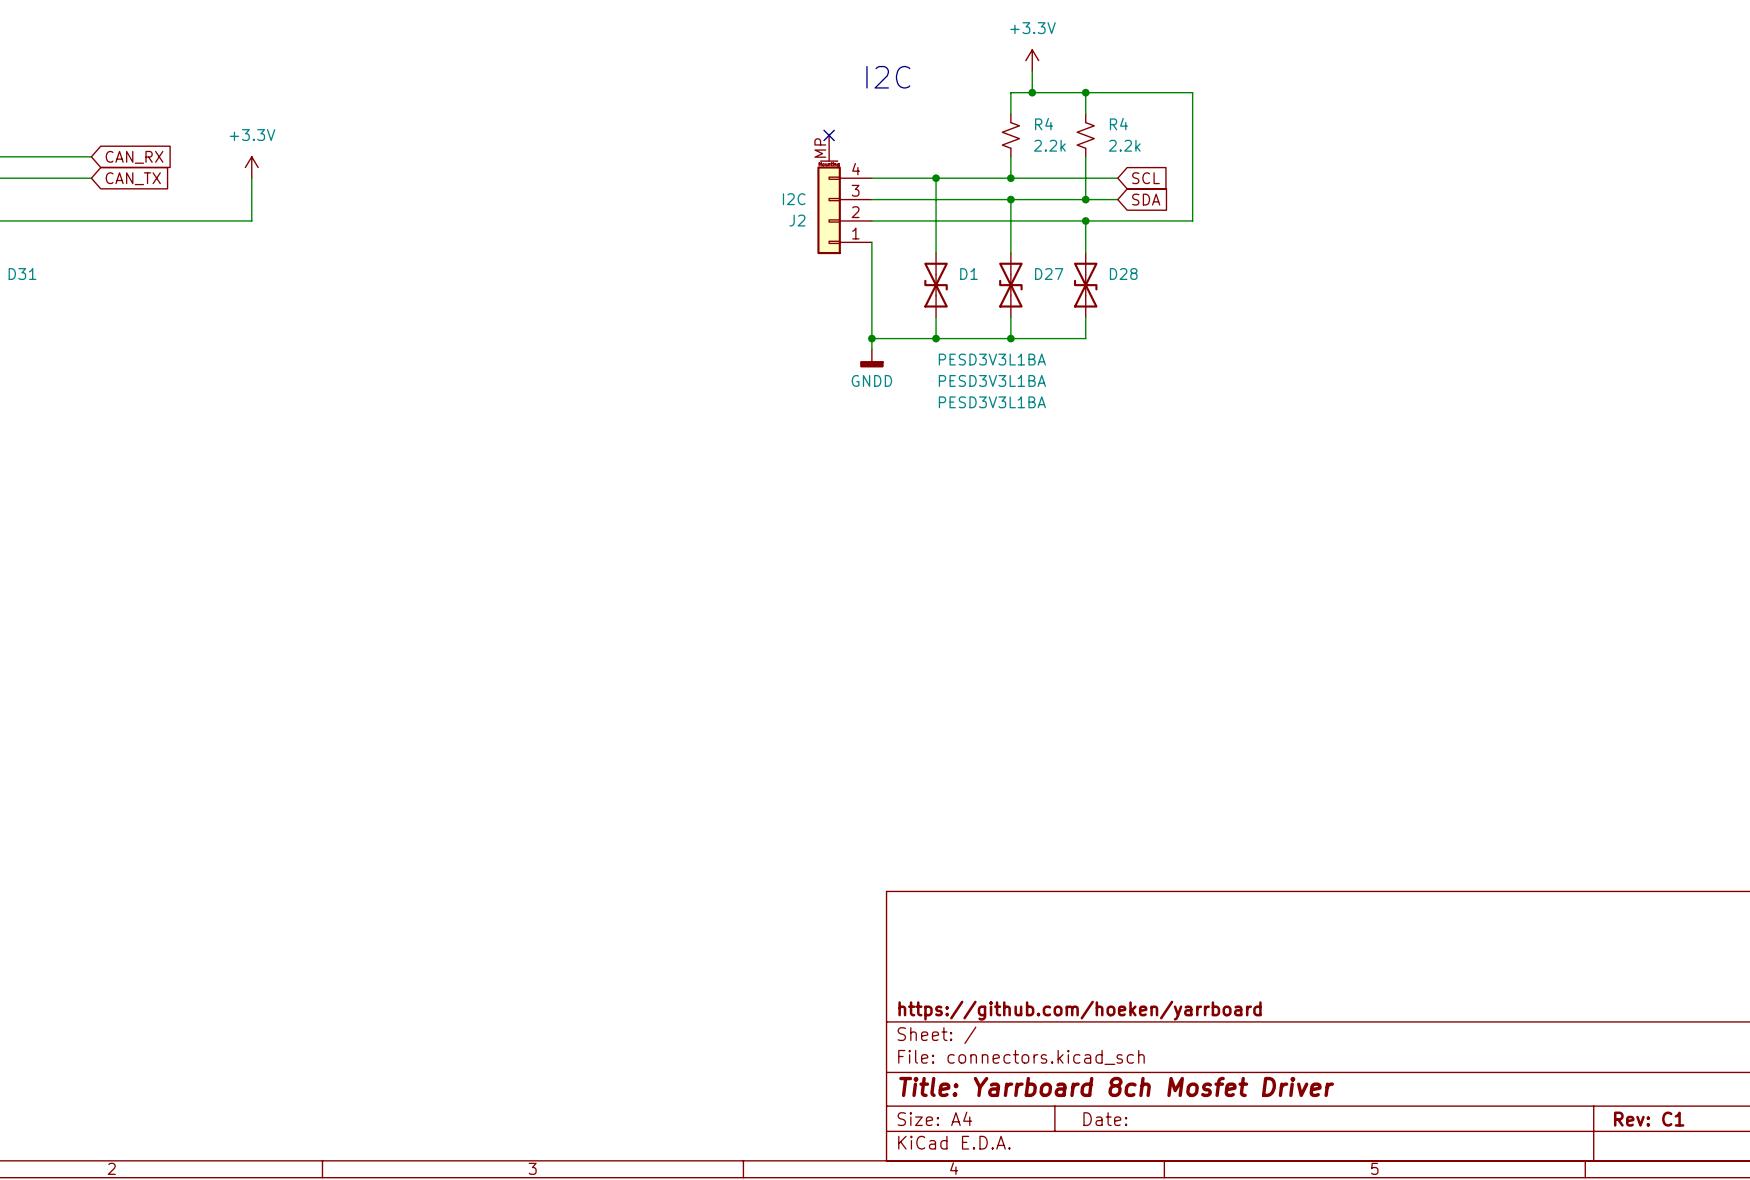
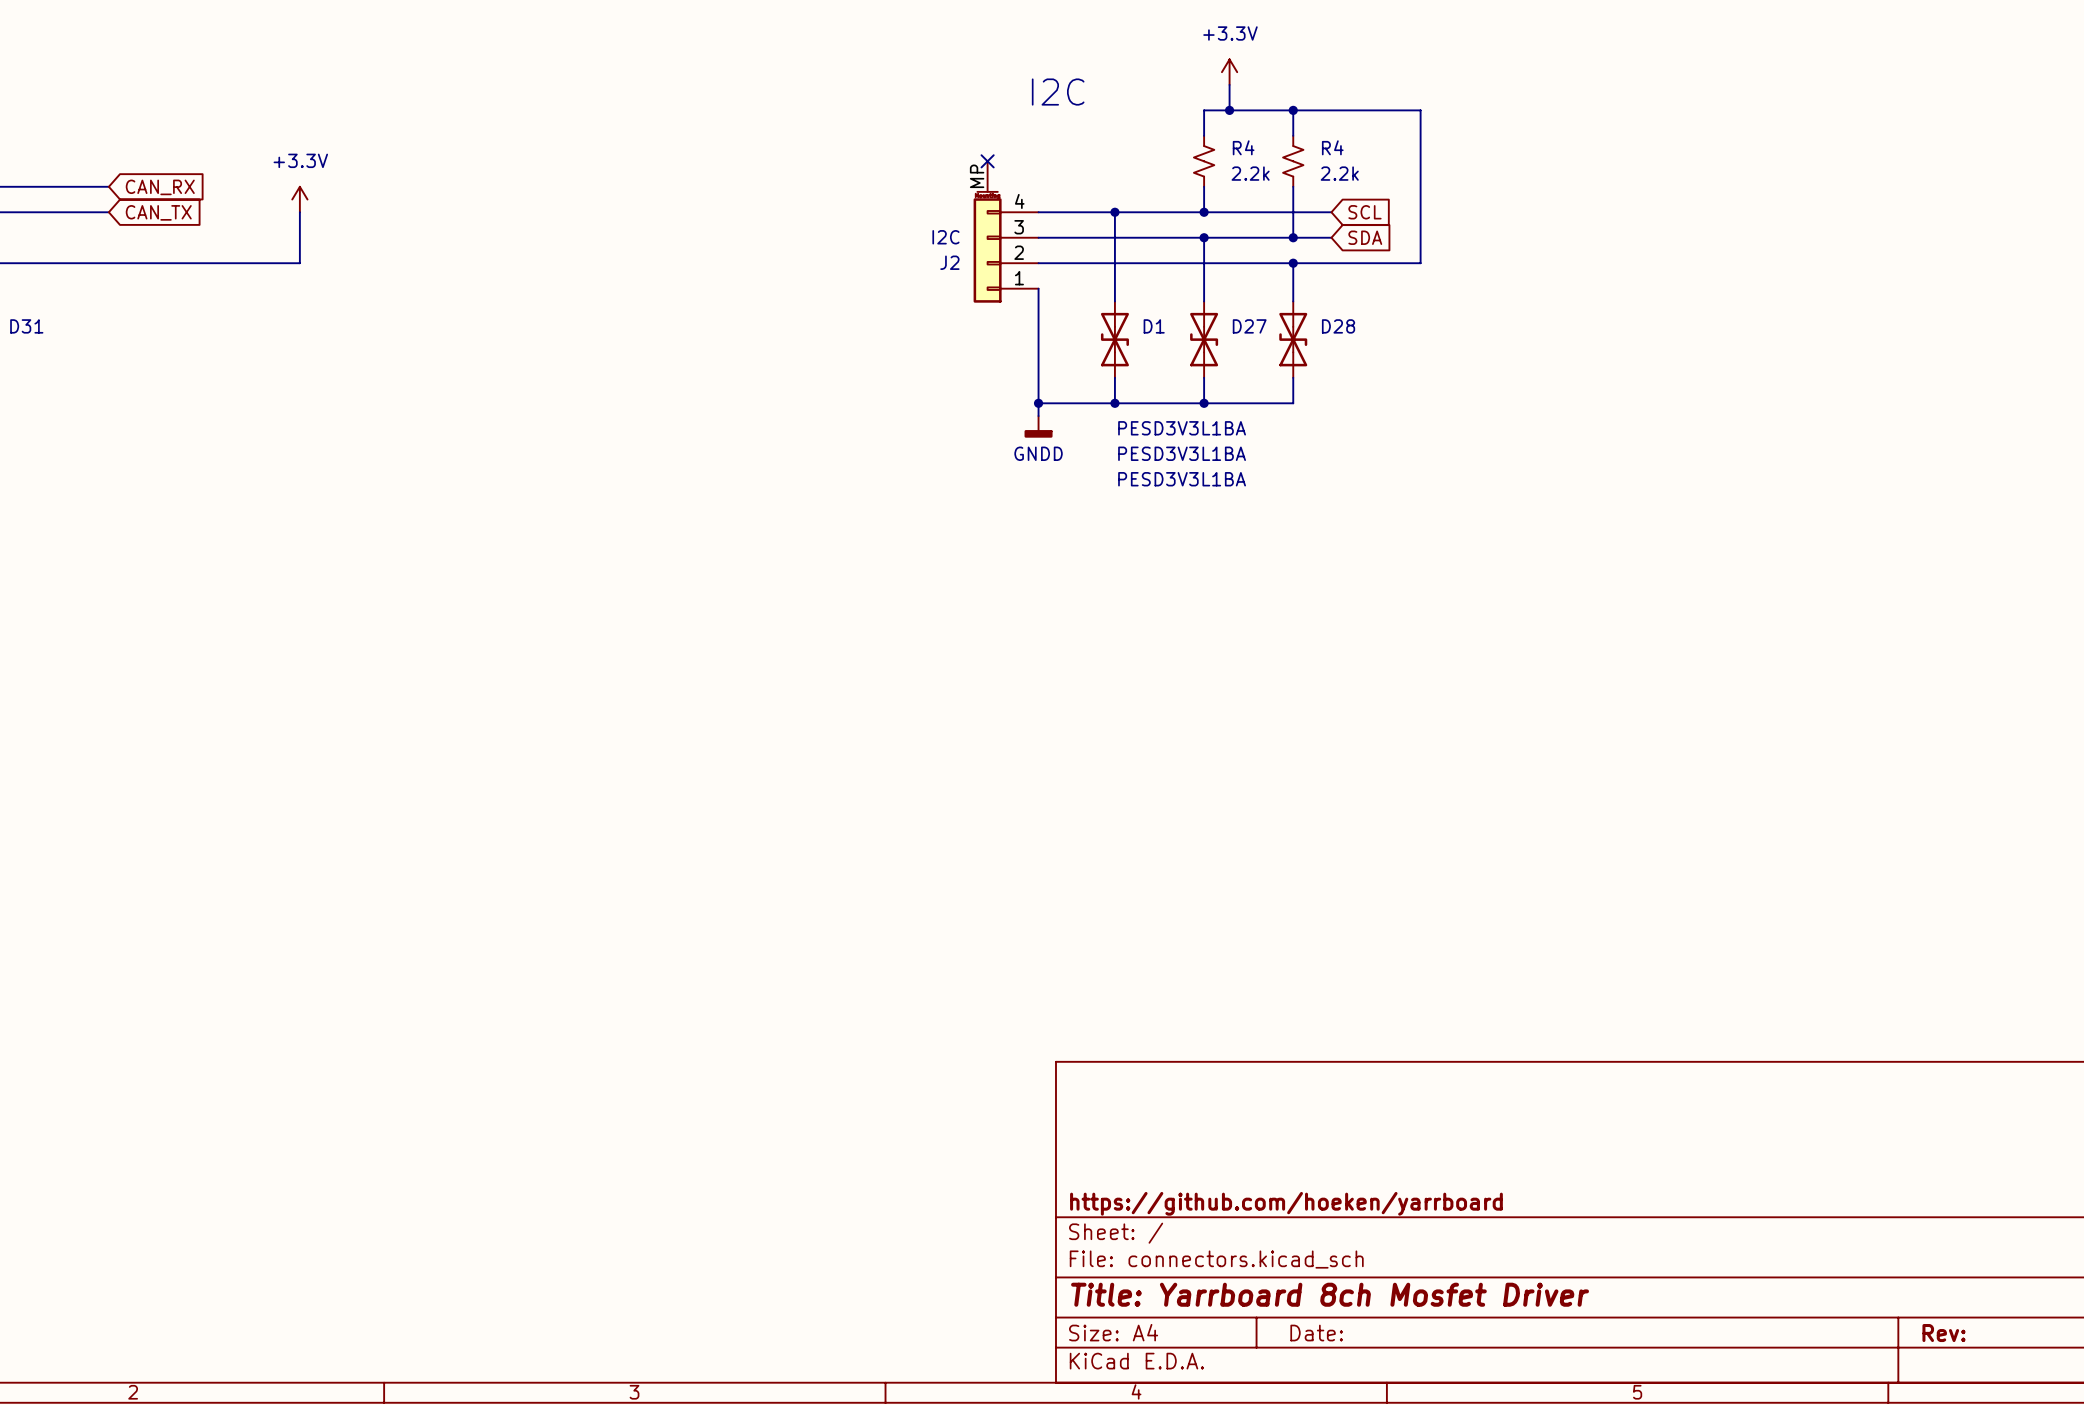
title block: Rev: C1 (1649, 1119) -> Rev: (1944, 1333)

